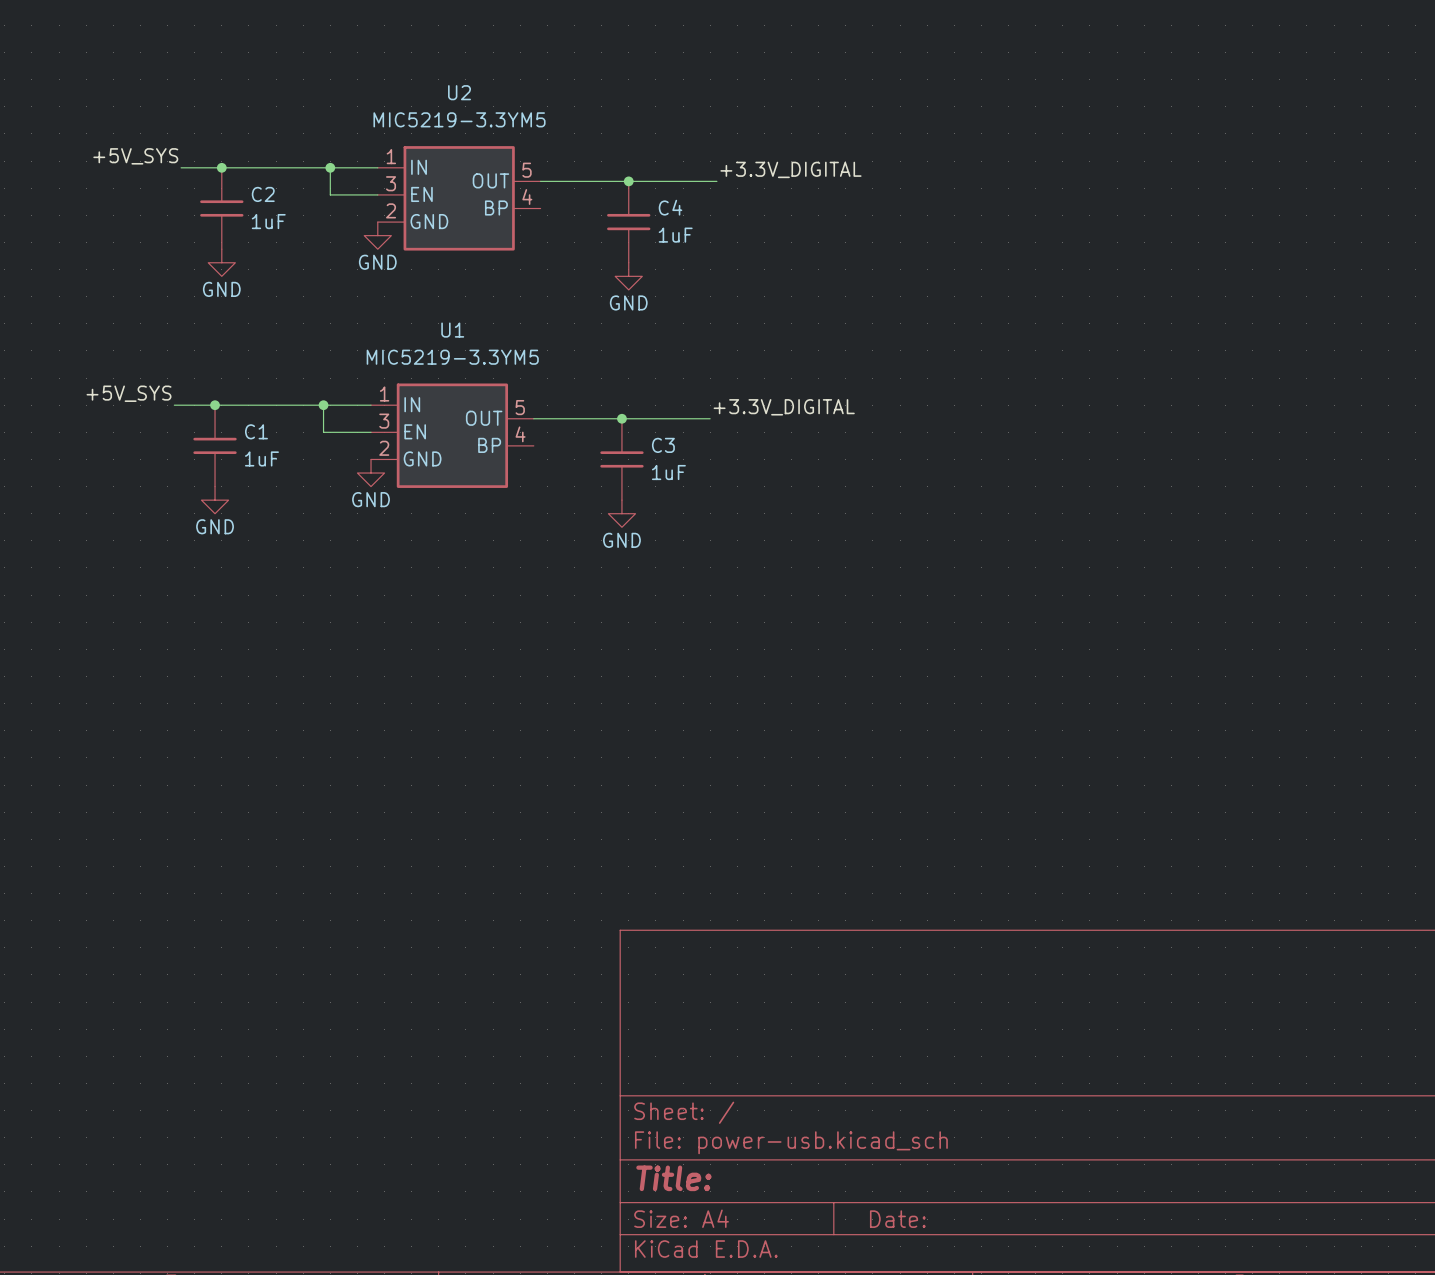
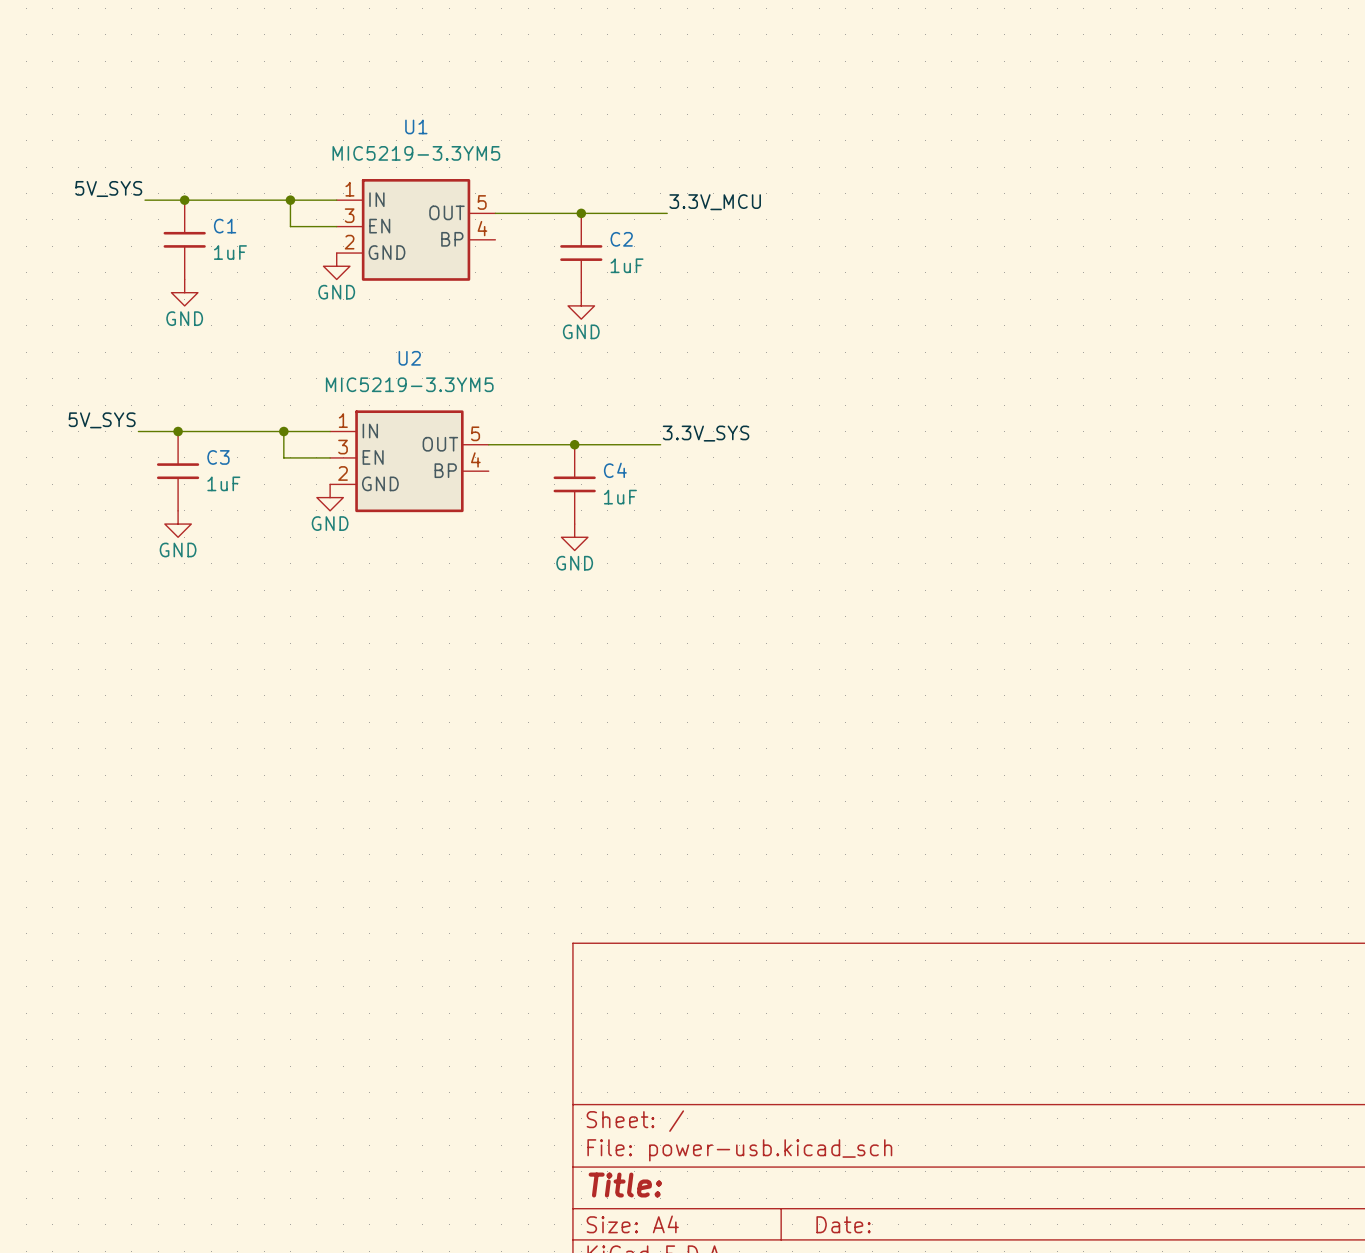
U2 name: U2 (459, 92) -> U1 (416, 126)
label: +5V_SYS (135, 156) -> 5V_SYS (108, 188)
label: +3.3V_DIGITAL (790, 169) -> 3.3V_MCU (715, 202)
C2 name: C2 (263, 194) -> C1 (225, 226)
C4 name: C4 (670, 207) -> C2 (621, 239)
U1 name: U1 (452, 330) -> U2 (409, 358)
label: +5V_SYS (129, 393) -> 5V_SYS (102, 420)
label: +3.3V_DIGITAL (784, 407) -> 3.3V_SYS (706, 433)
C1 name: C1 (256, 431) -> C3 (218, 457)
C3 name: C3 (663, 445) -> C4 (615, 470)

